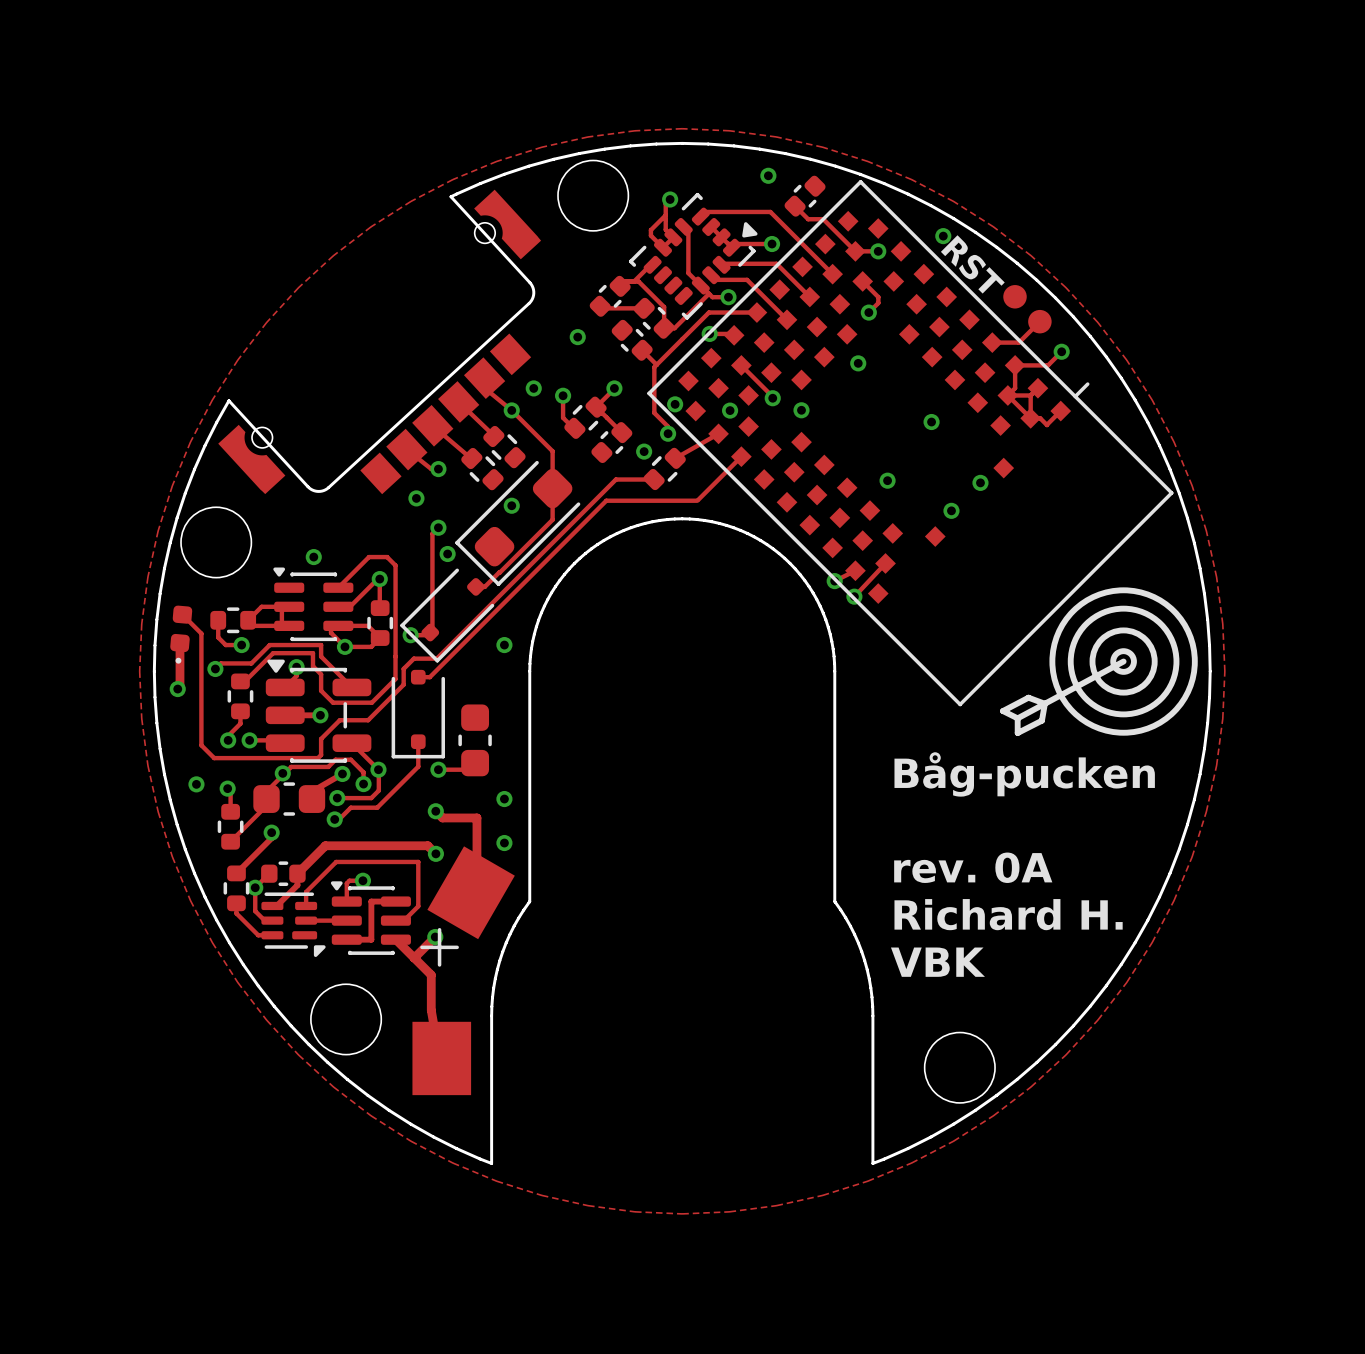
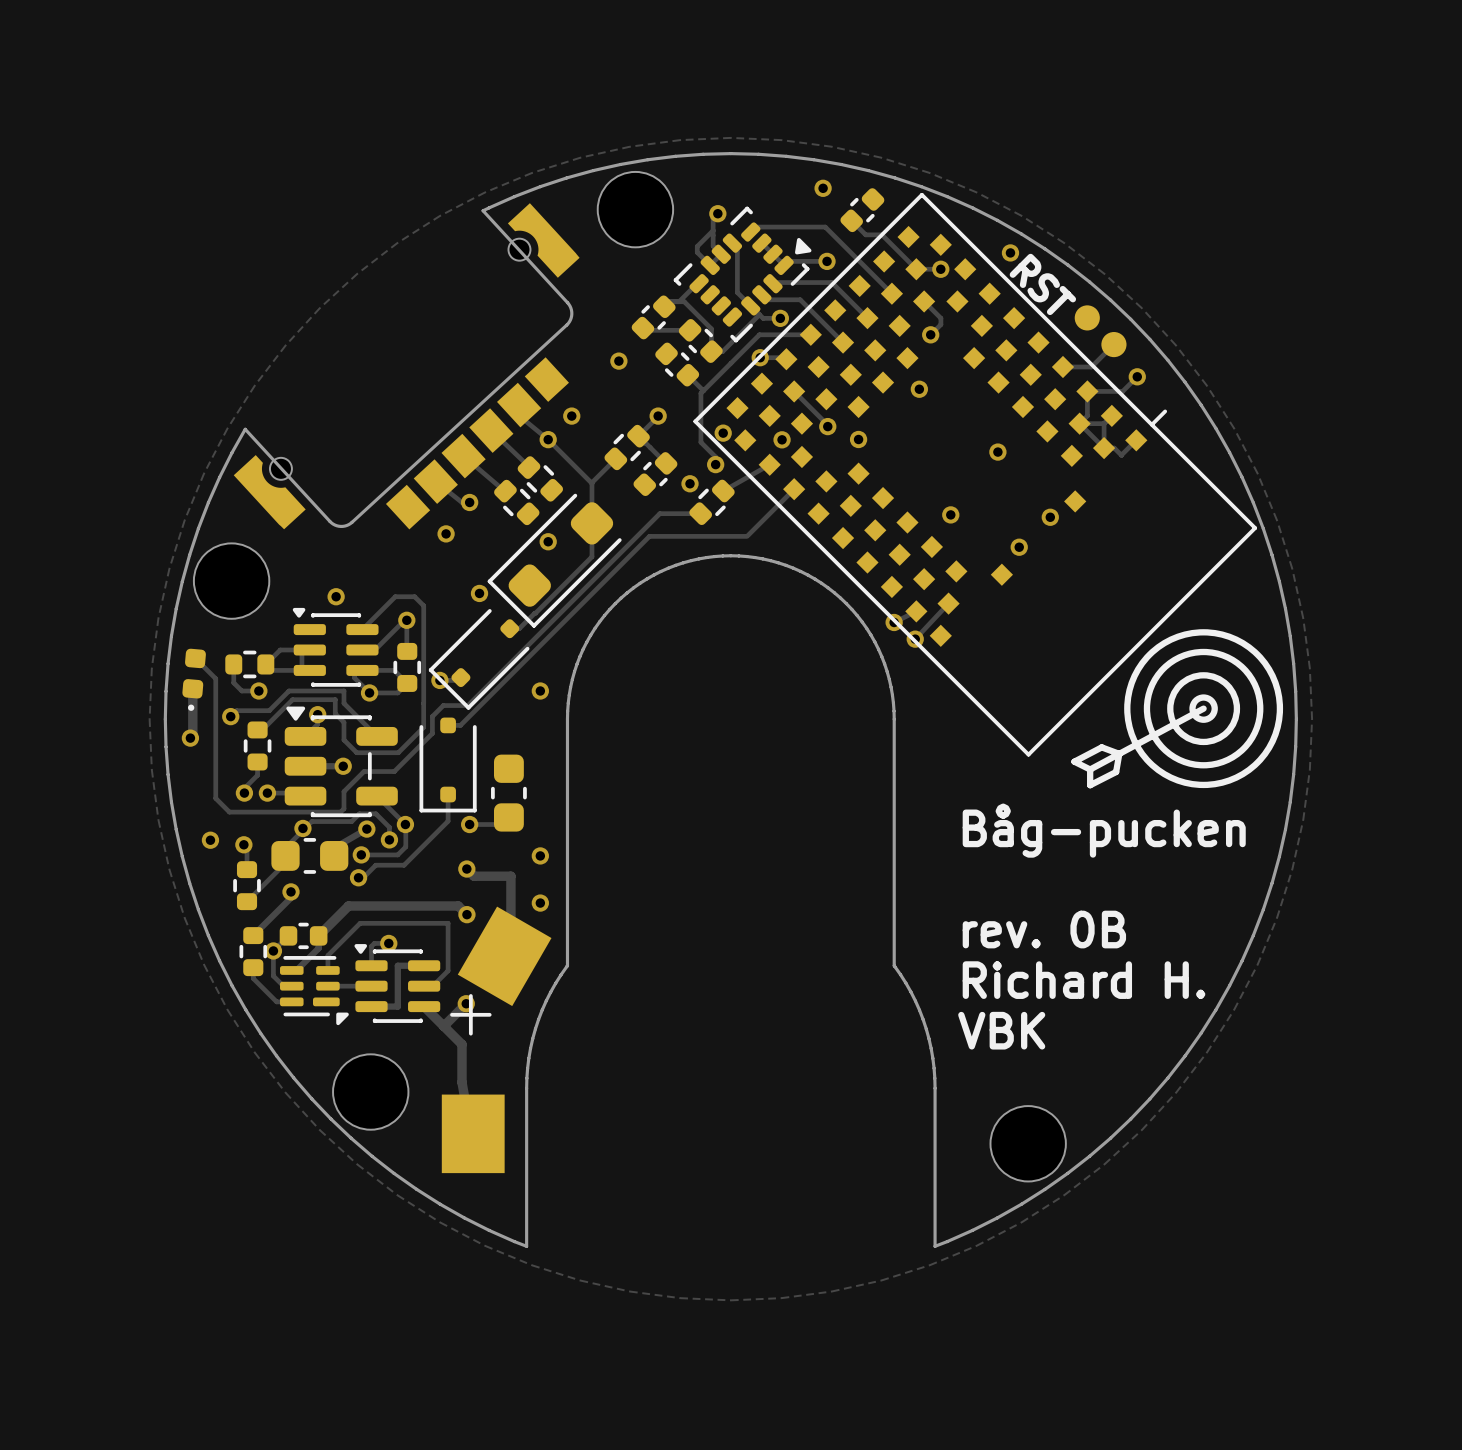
track: (563, 395) (563, 417) (574, 429) -> (591, 483) (615, 458)
via: (563, 395) -> none
track: (438, 527) (432, 533) (432, 630) -> none
via: (438, 527) -> none
text: rev. 0A (973, 867) -> rev. 0B (1044, 929)

